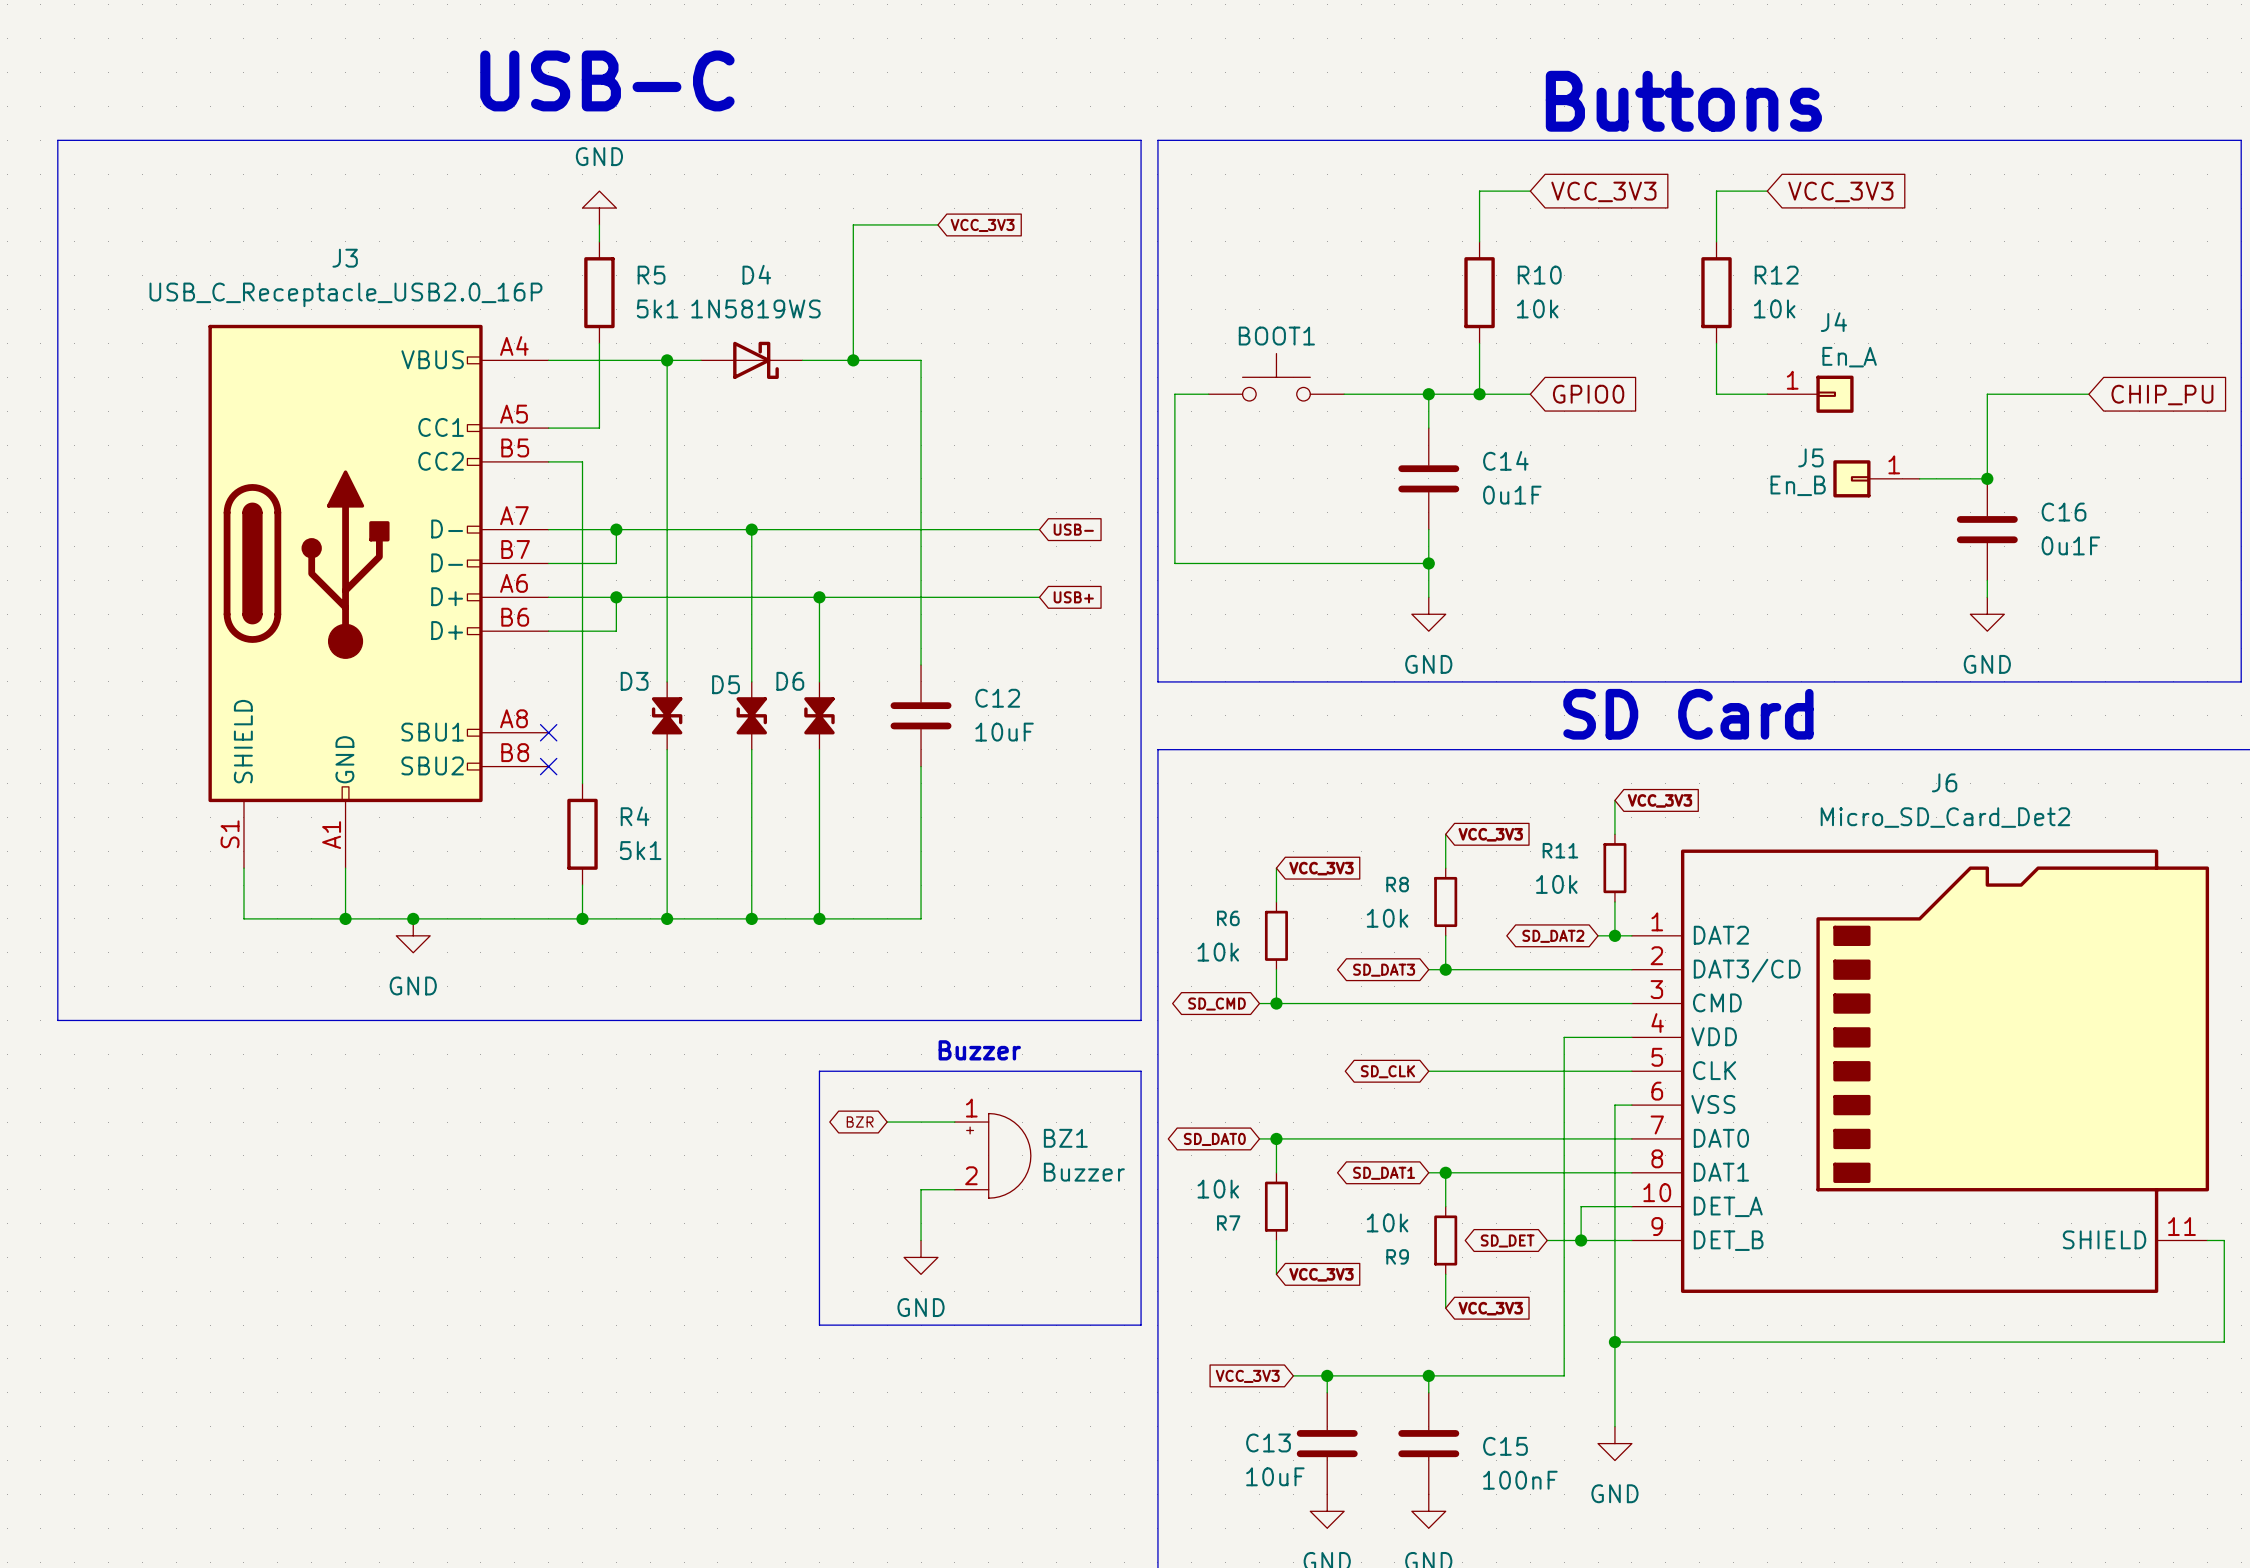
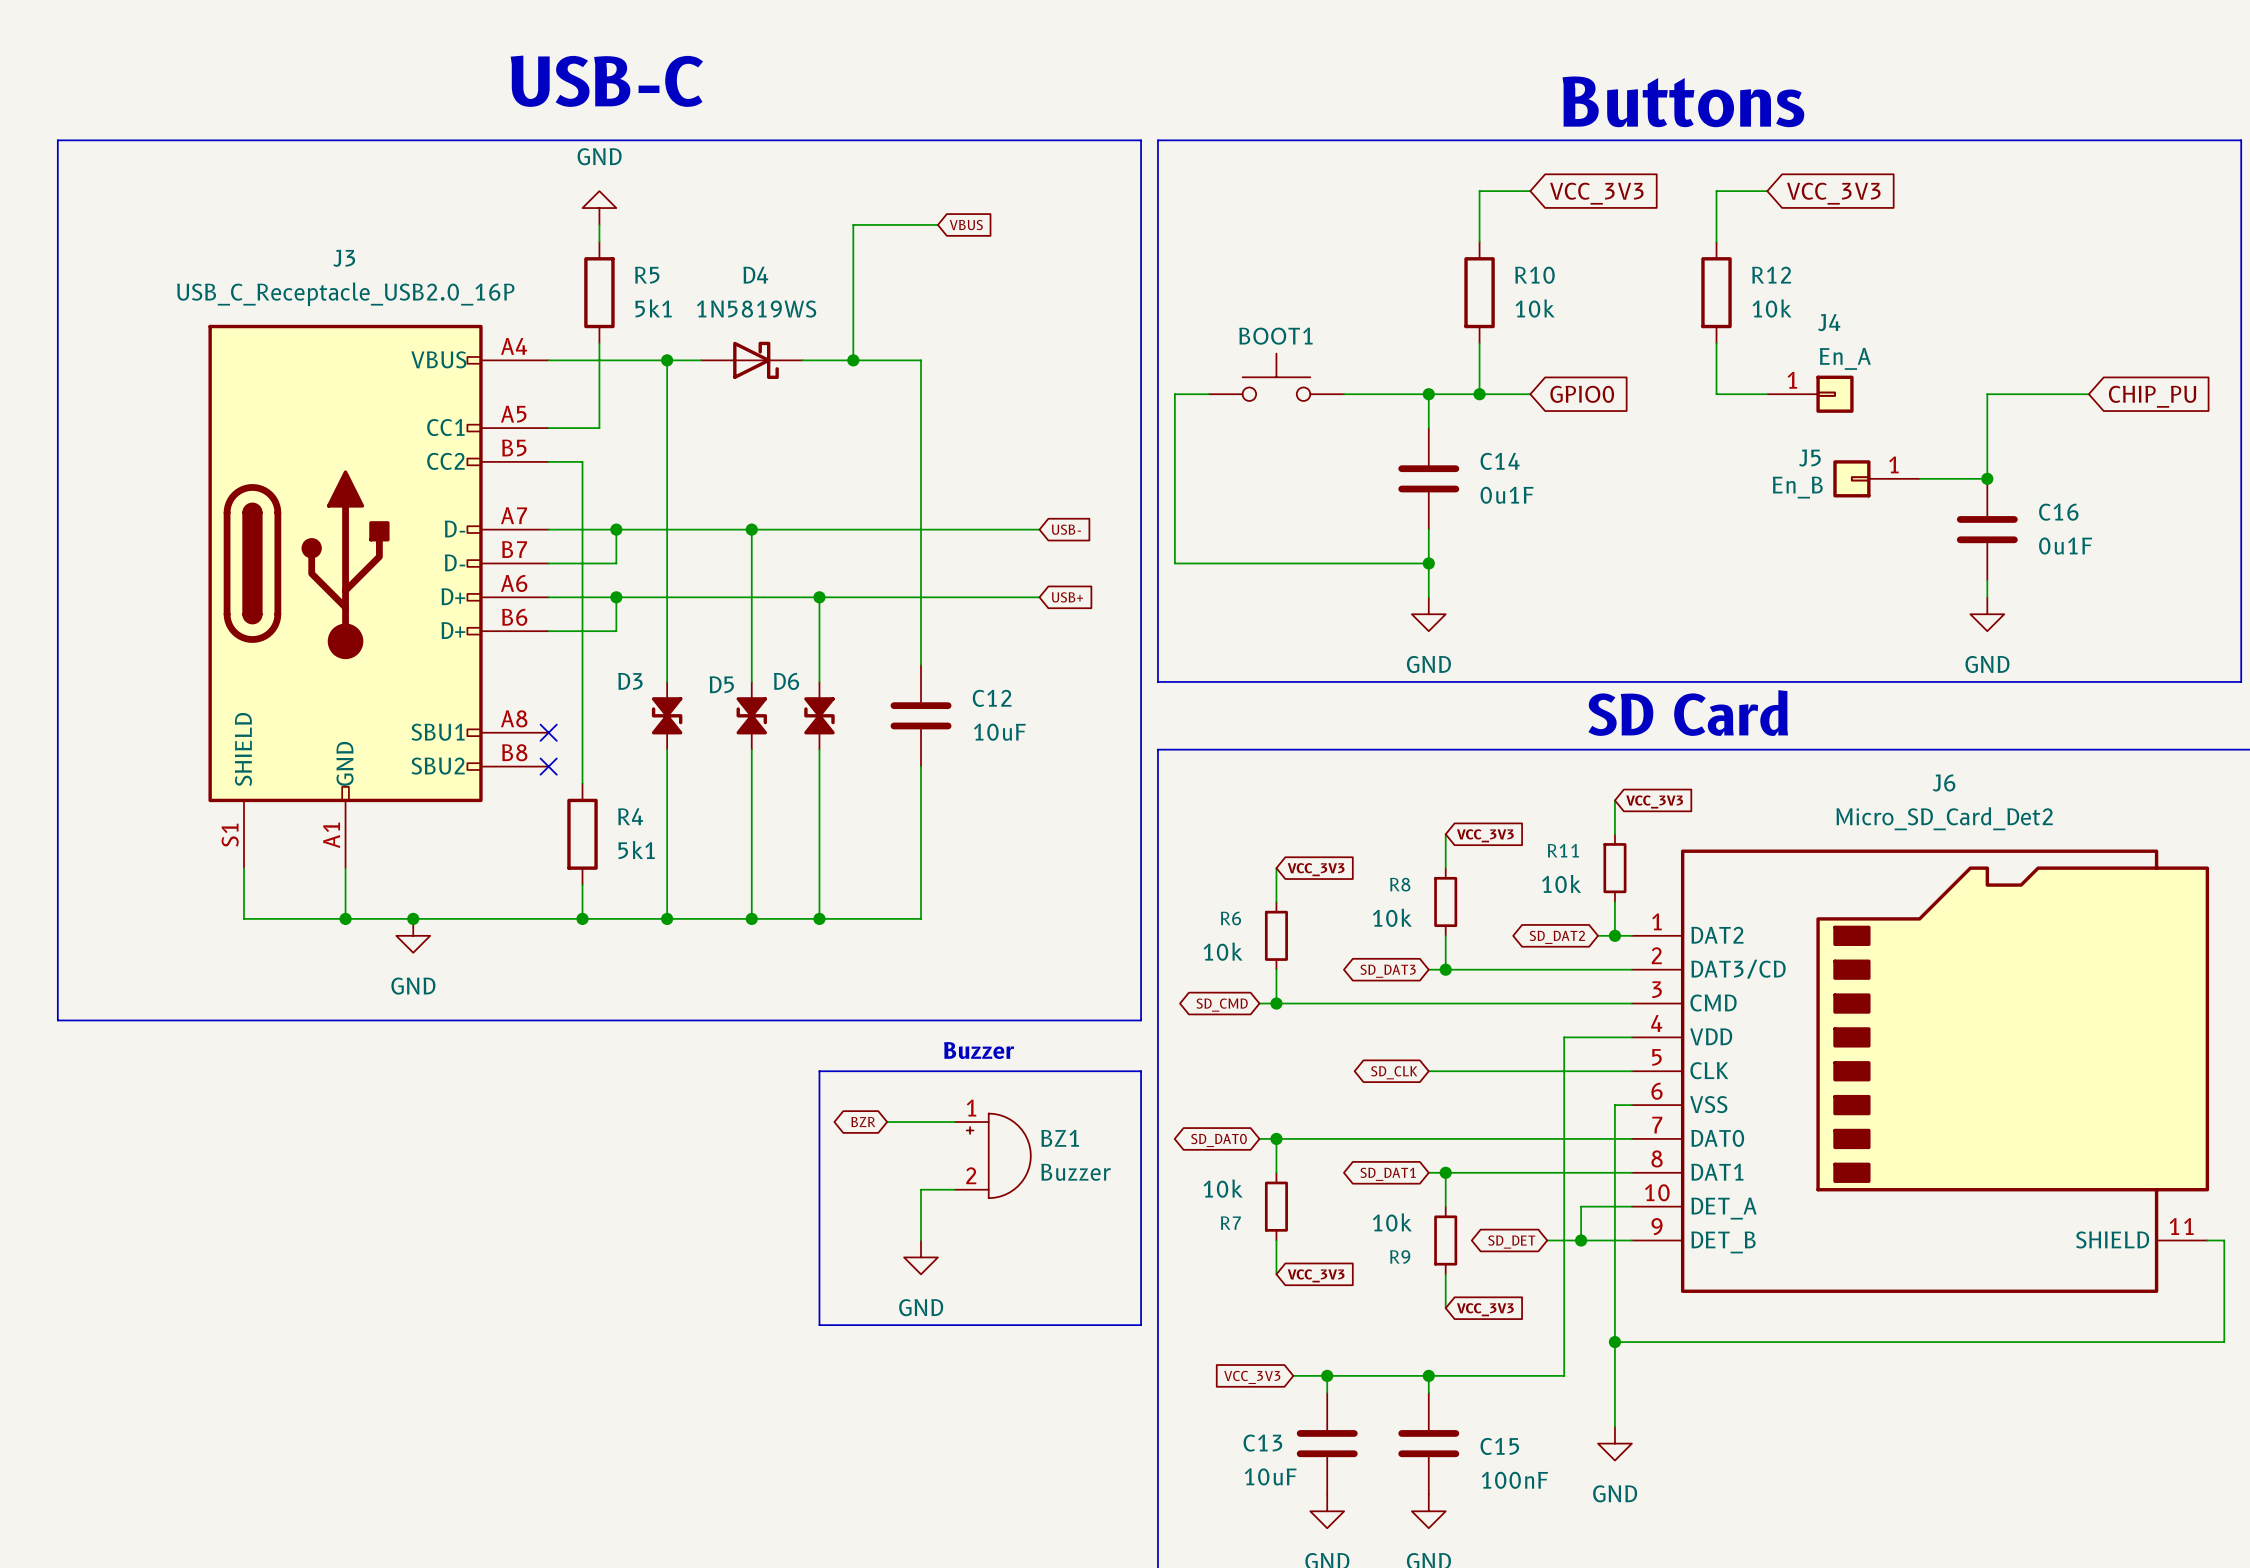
global label: VCC_3V3 (982, 225) -> VBUS (966, 225)

